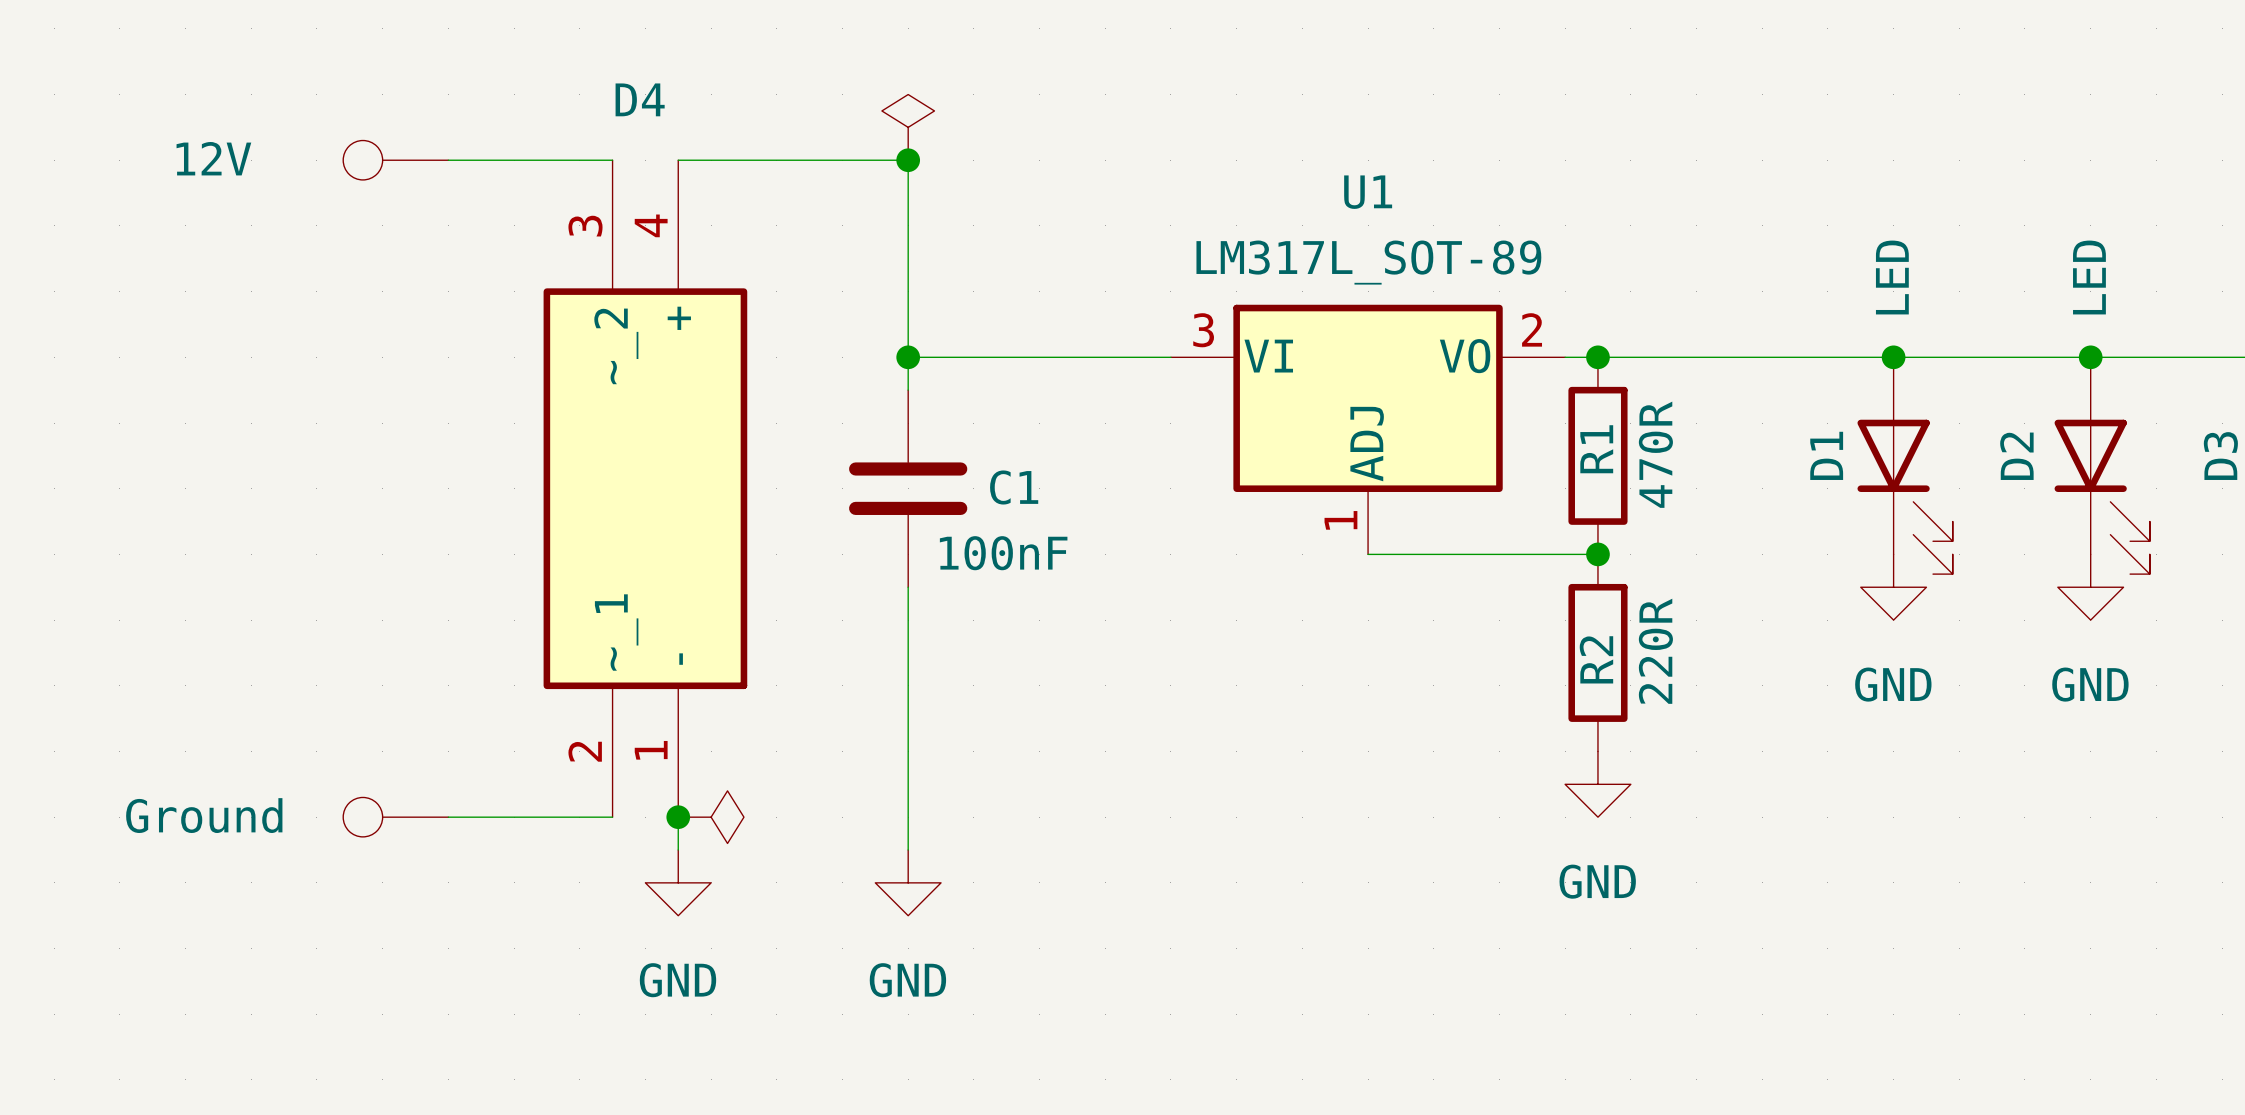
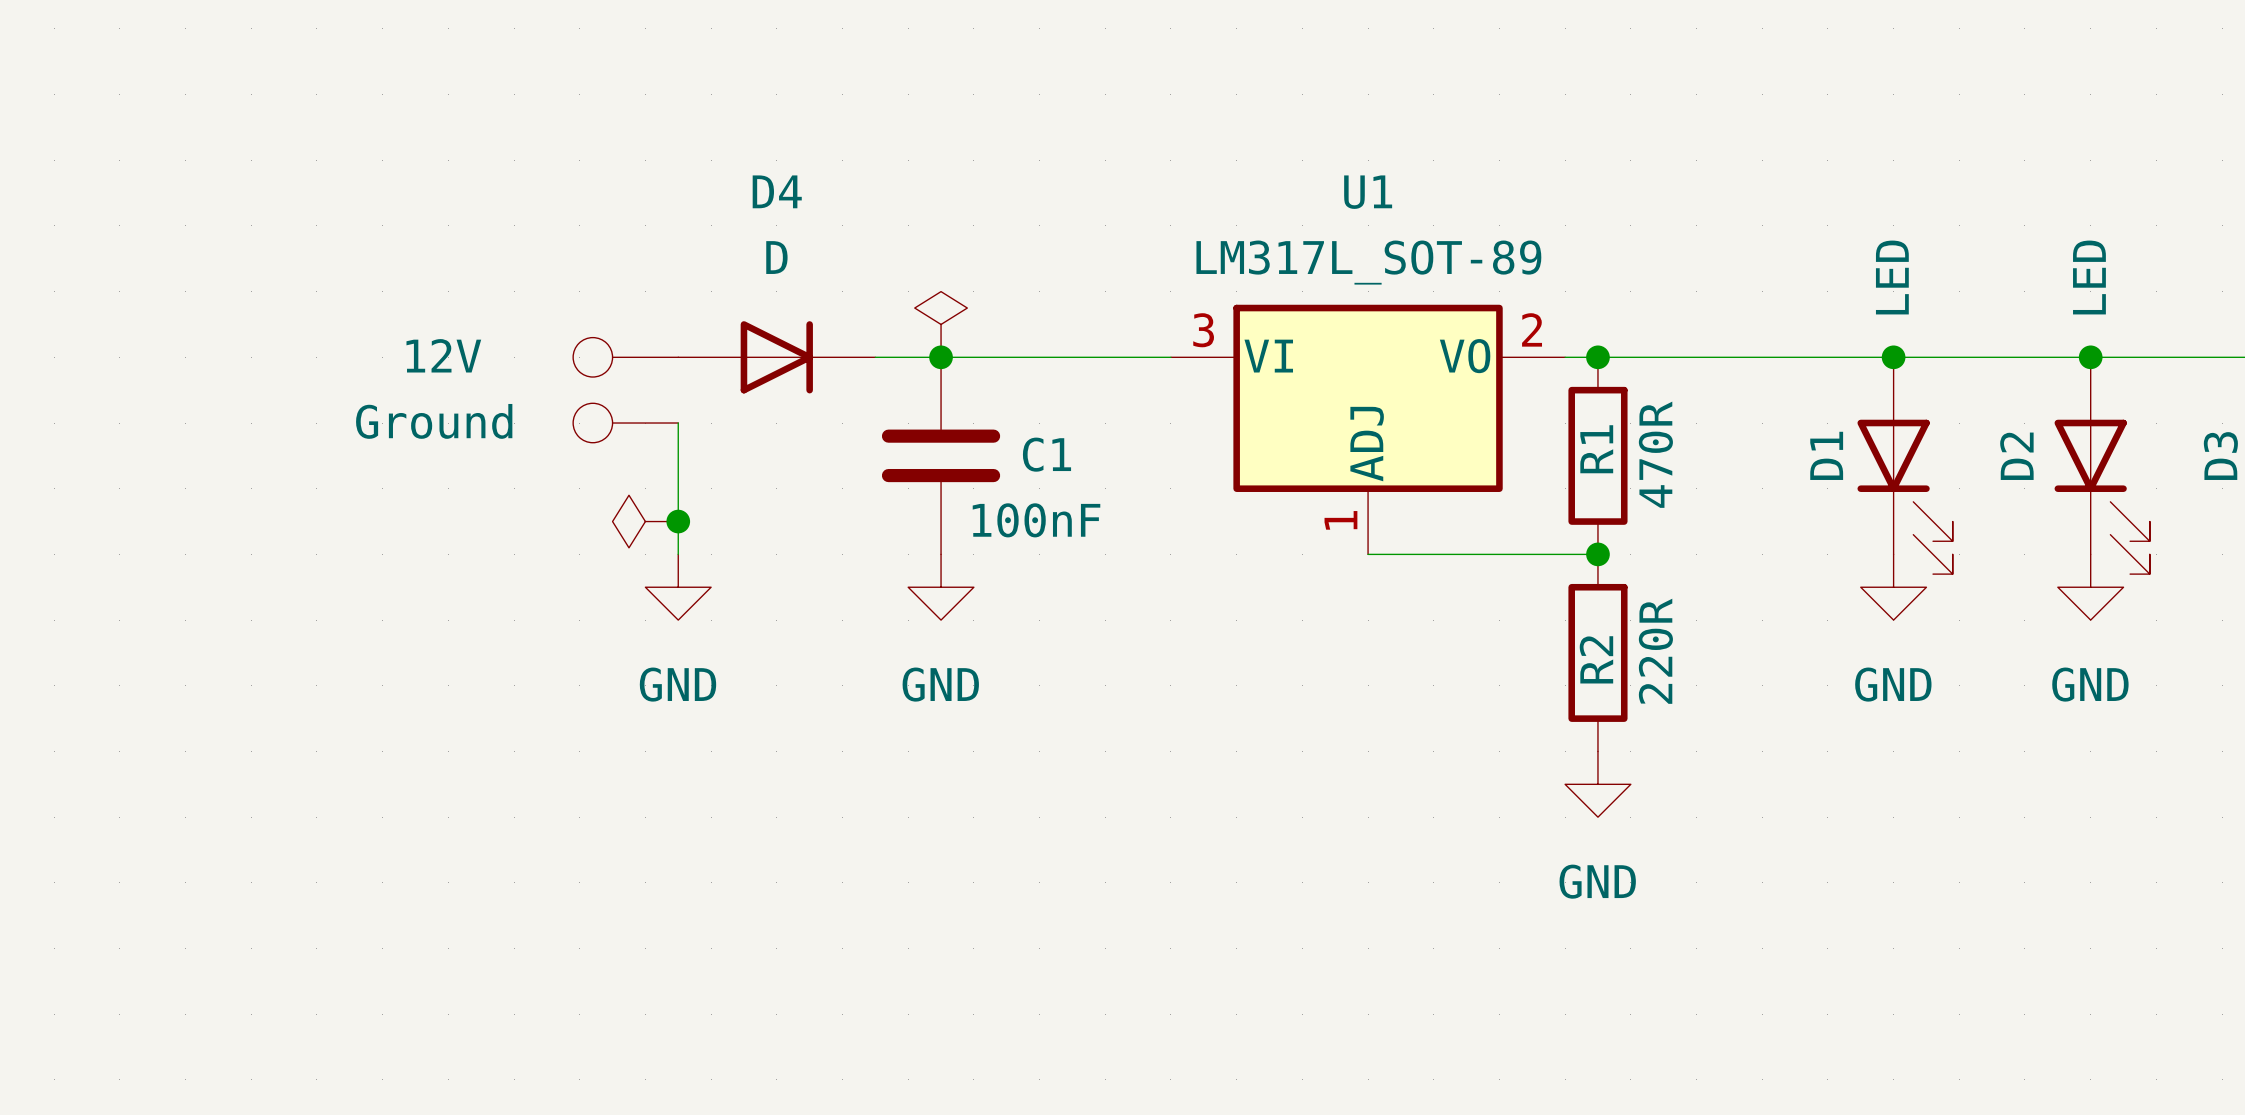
D4 name position: D4 (640, 99) -> D4 (777, 191)
power symbol position: (908, 127) -> (941, 324)
part position: (395, 160) -> (625, 357)
wire: (448, 160) (612, 160) -> none
D4 symbol: [543, 160, 748, 818] -> [678, 321, 876, 394]
wire: (678, 160) (908, 160) (908, 390) -> none
junction: (908, 160) -> none
D4 value: none -> D (776, 257)
wire: none -> (875, 357) (908, 357)
junction position: (908, 357) -> (941, 357)
C1 position: (908, 488) -> (941, 455)
power symbol: none -> (645, 521)
junction: none -> (678, 521)
power symbol: none -> GND (678, 587)
wire: (908, 587) (908, 850) -> none
power symbol: none -> GND (941, 587)
part position: (395, 817) -> (625, 423)
wire: (448, 817) (612, 817) -> none
wire: (678, 817) (678, 850) -> none
junction: (678, 817) -> none
power symbol: (711, 817) -> none
power symbol: GND (678, 882) -> none
power symbol: GND (908, 882) -> none

